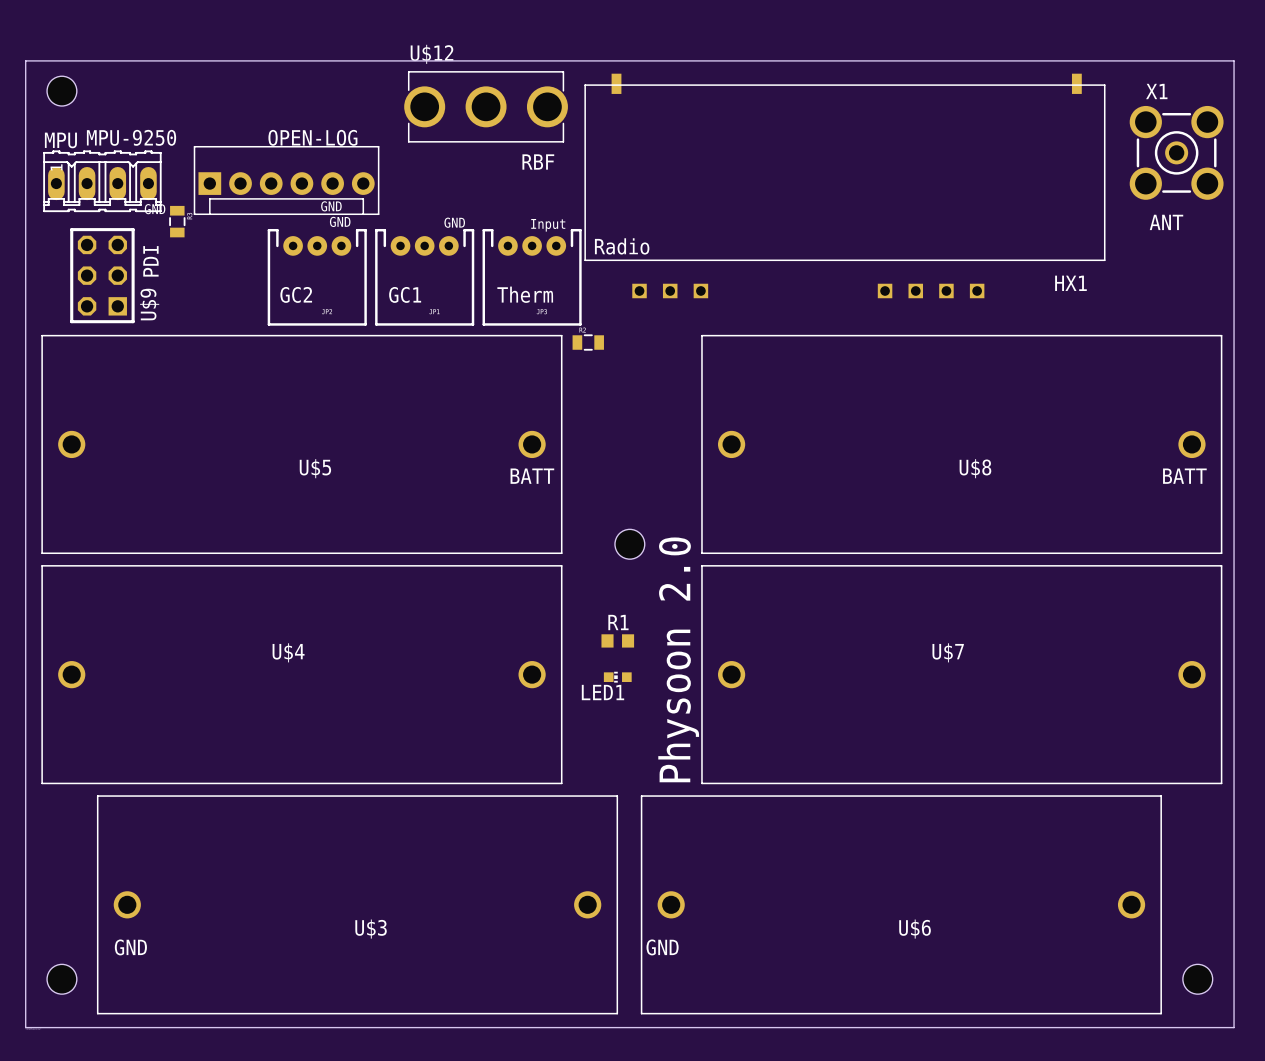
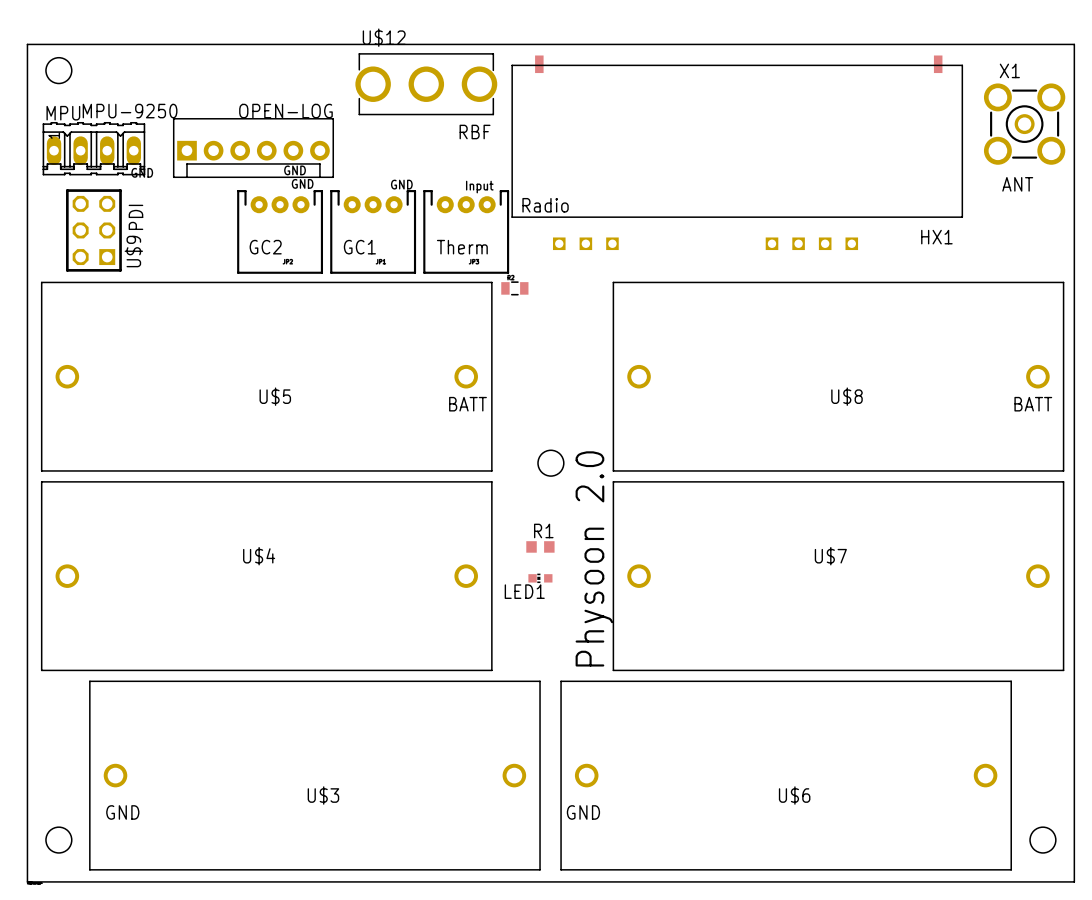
part: (177, 221) -> none

